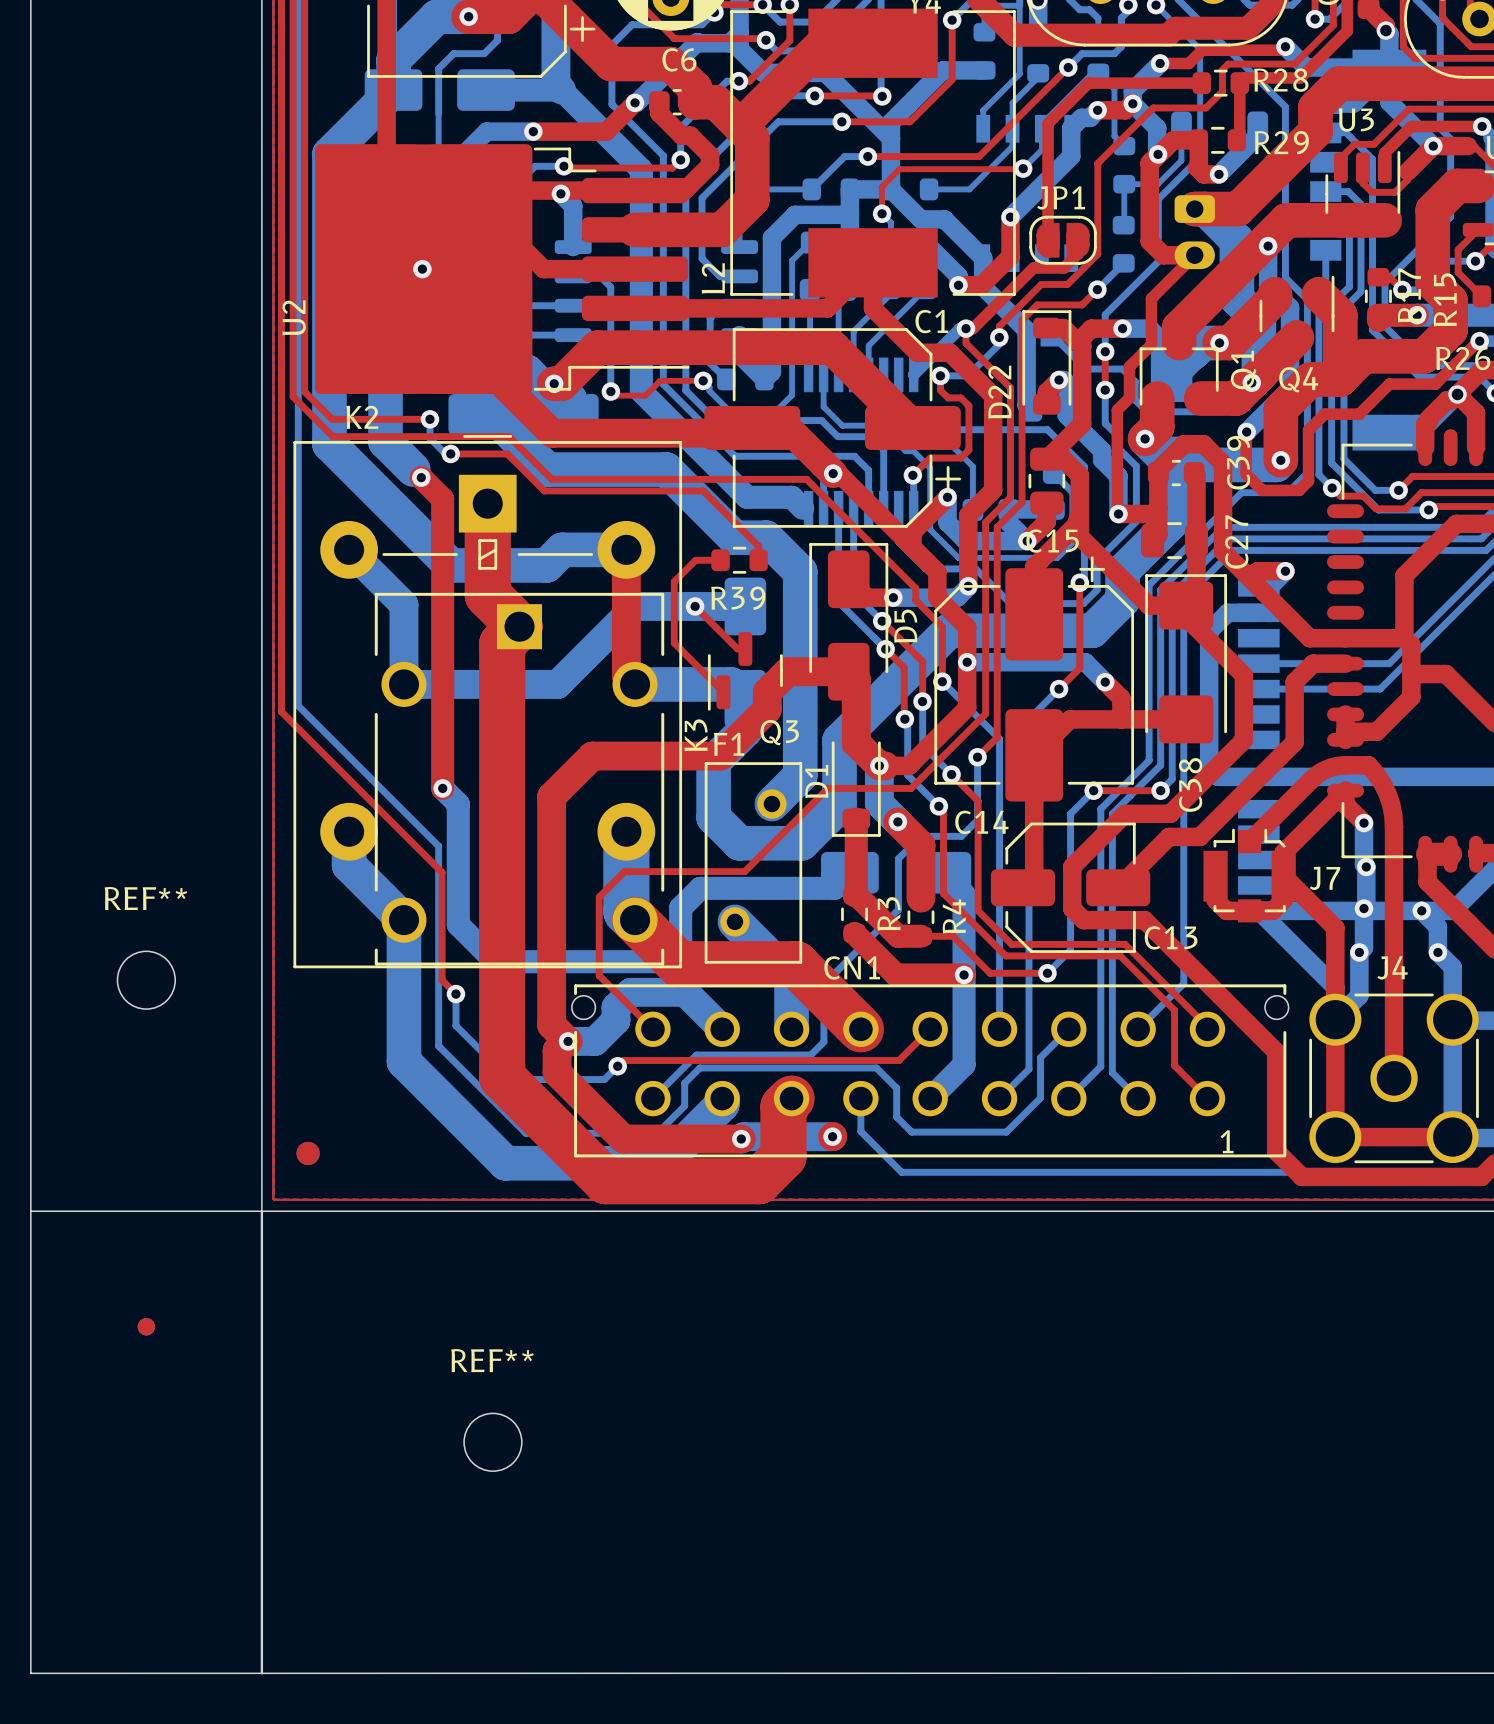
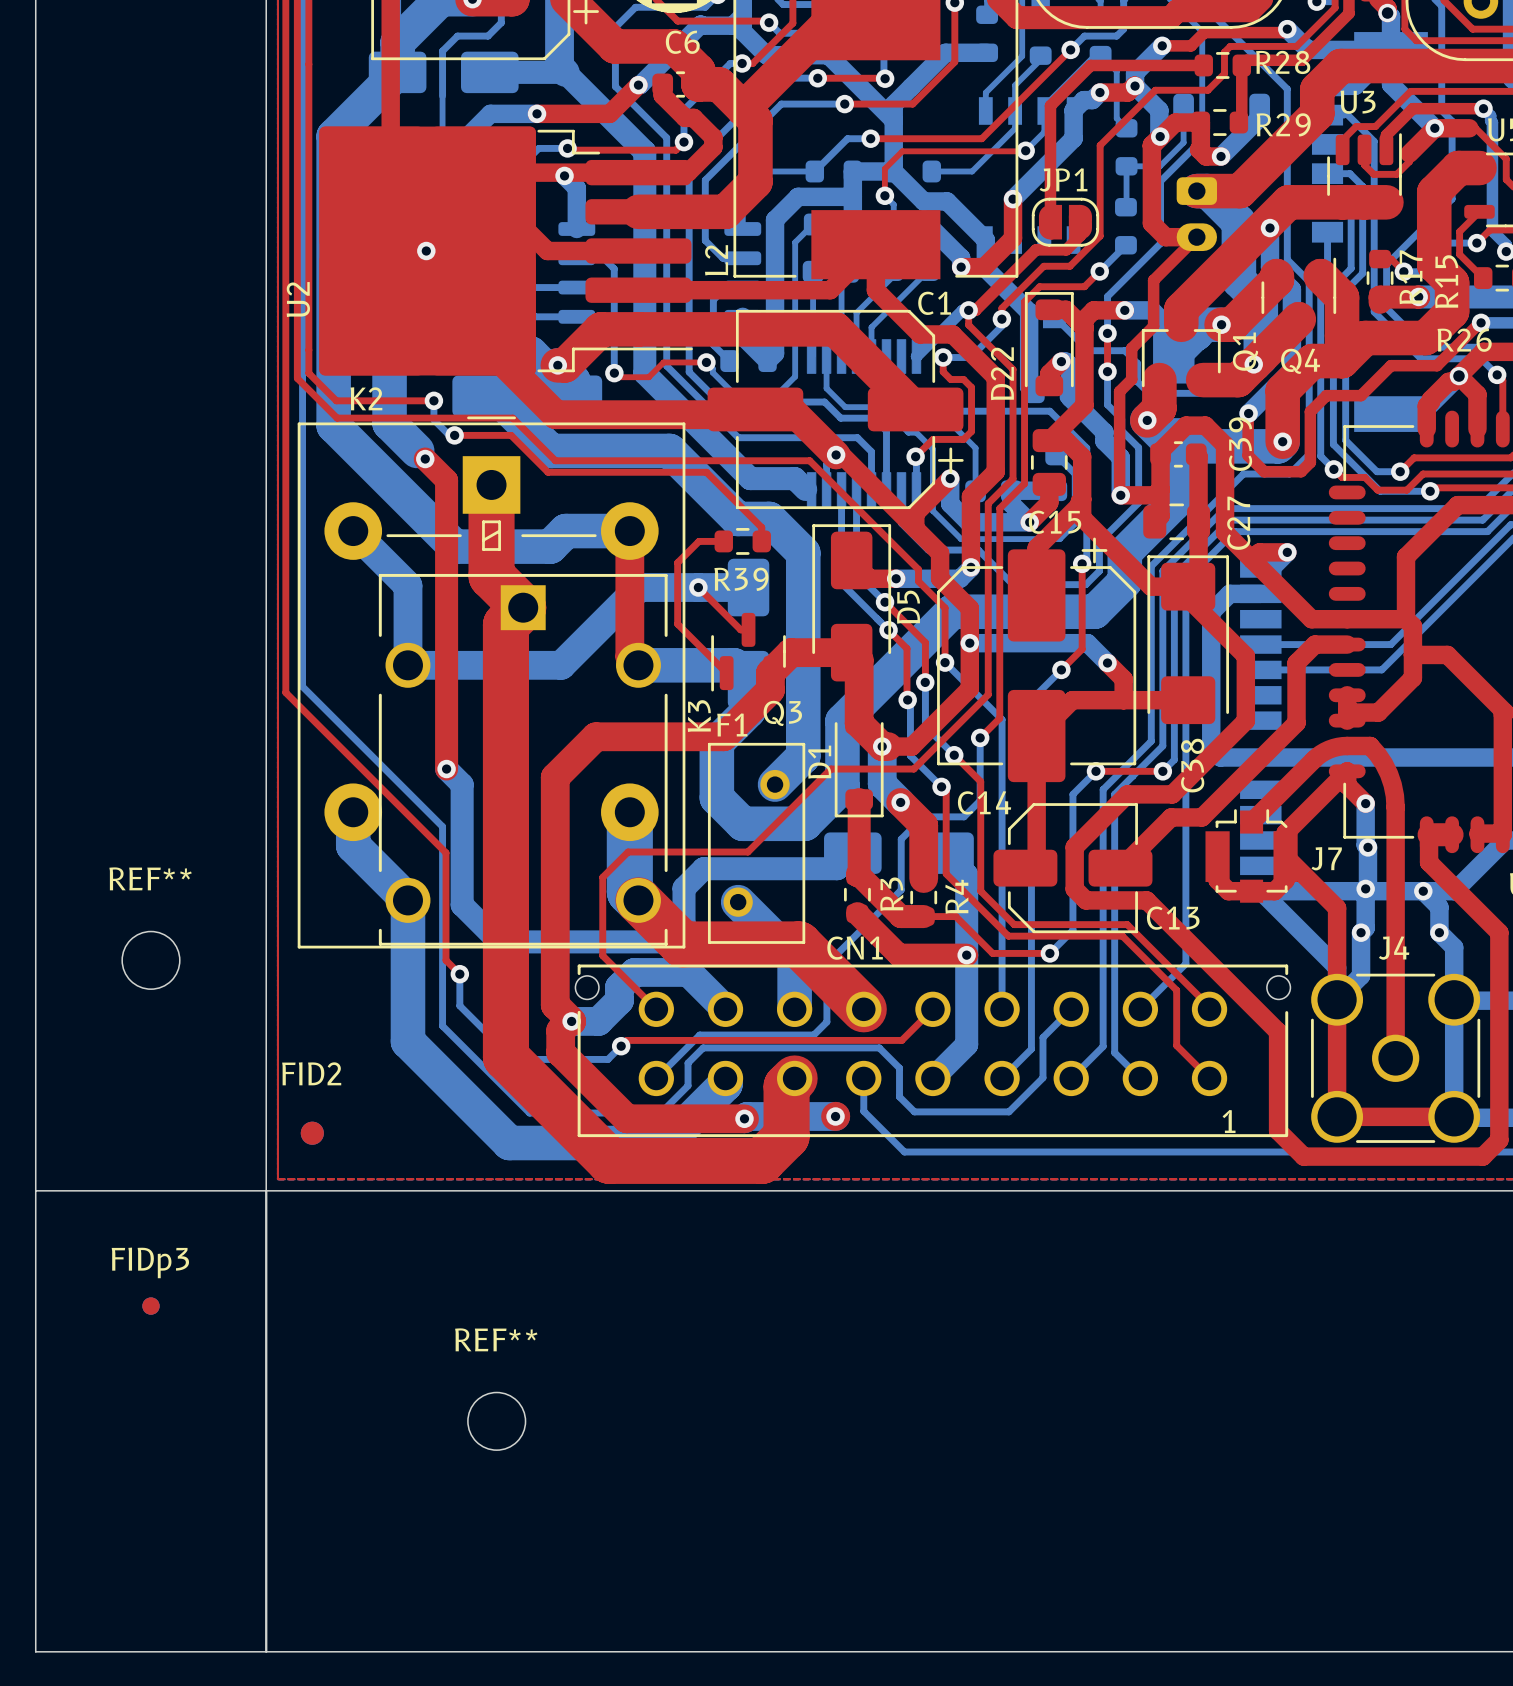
FID2 name: none -> FID2 (311, 1073)
FIDp3 name: none -> FIDp3 (150, 1262)

